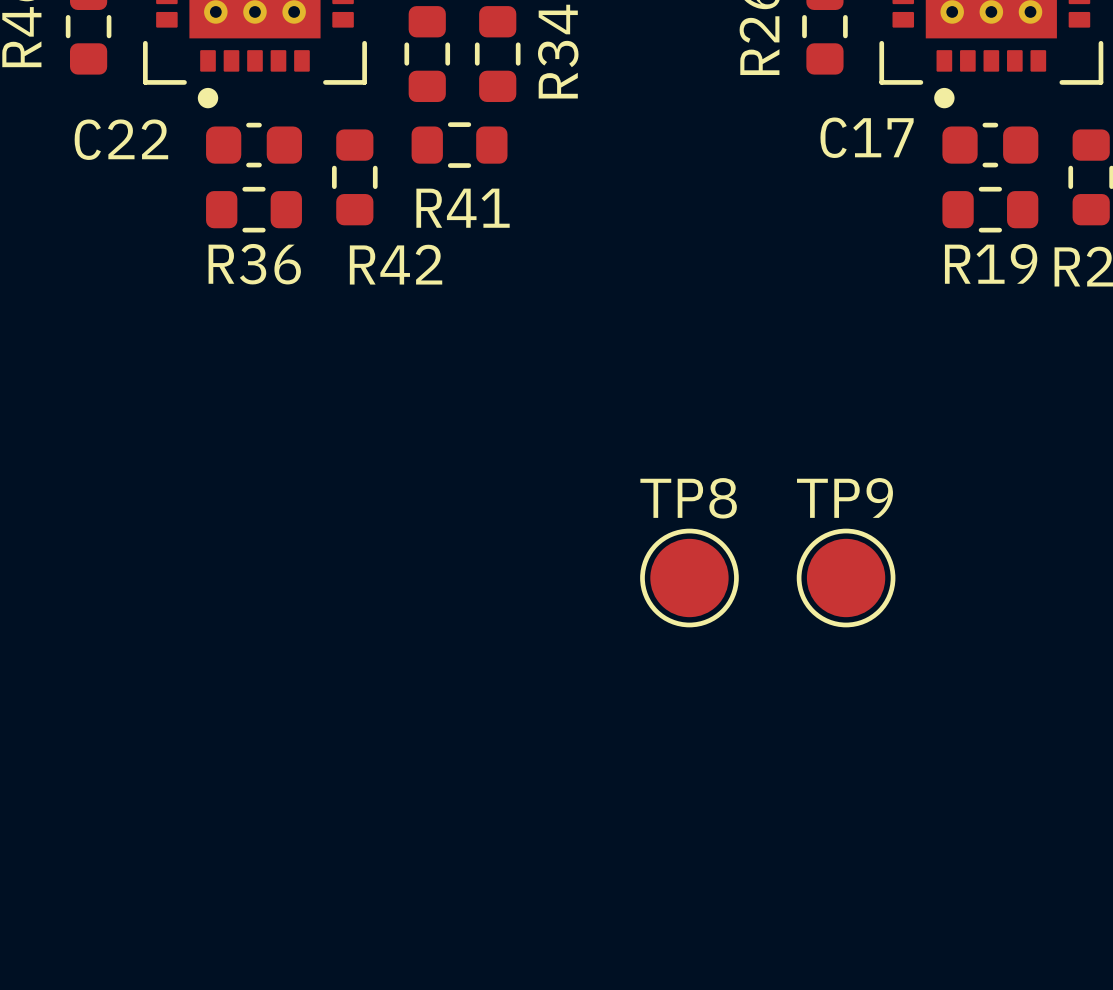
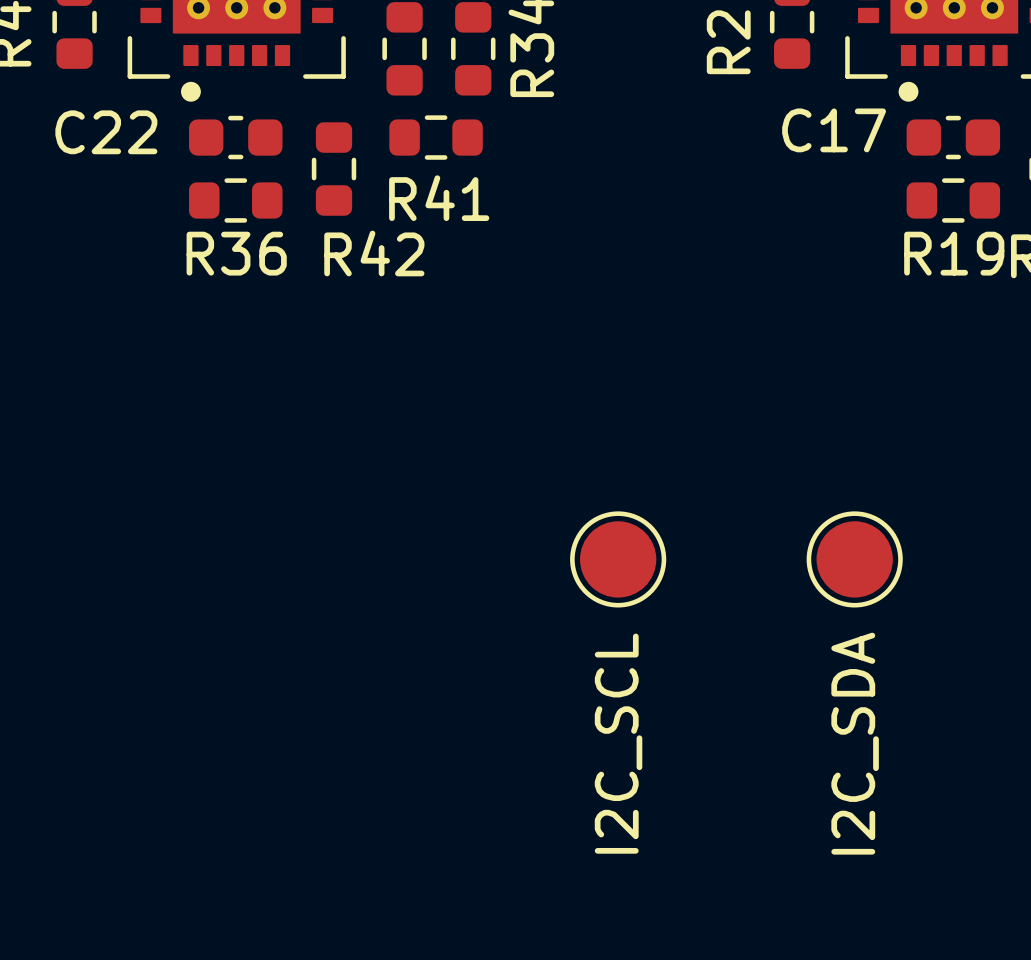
part: none -> I2C_SCL (618, 559)
TP8: (689, 578) -> none
TP9: (846, 578) -> none
part: none -> I2C_SDA (854, 559)

